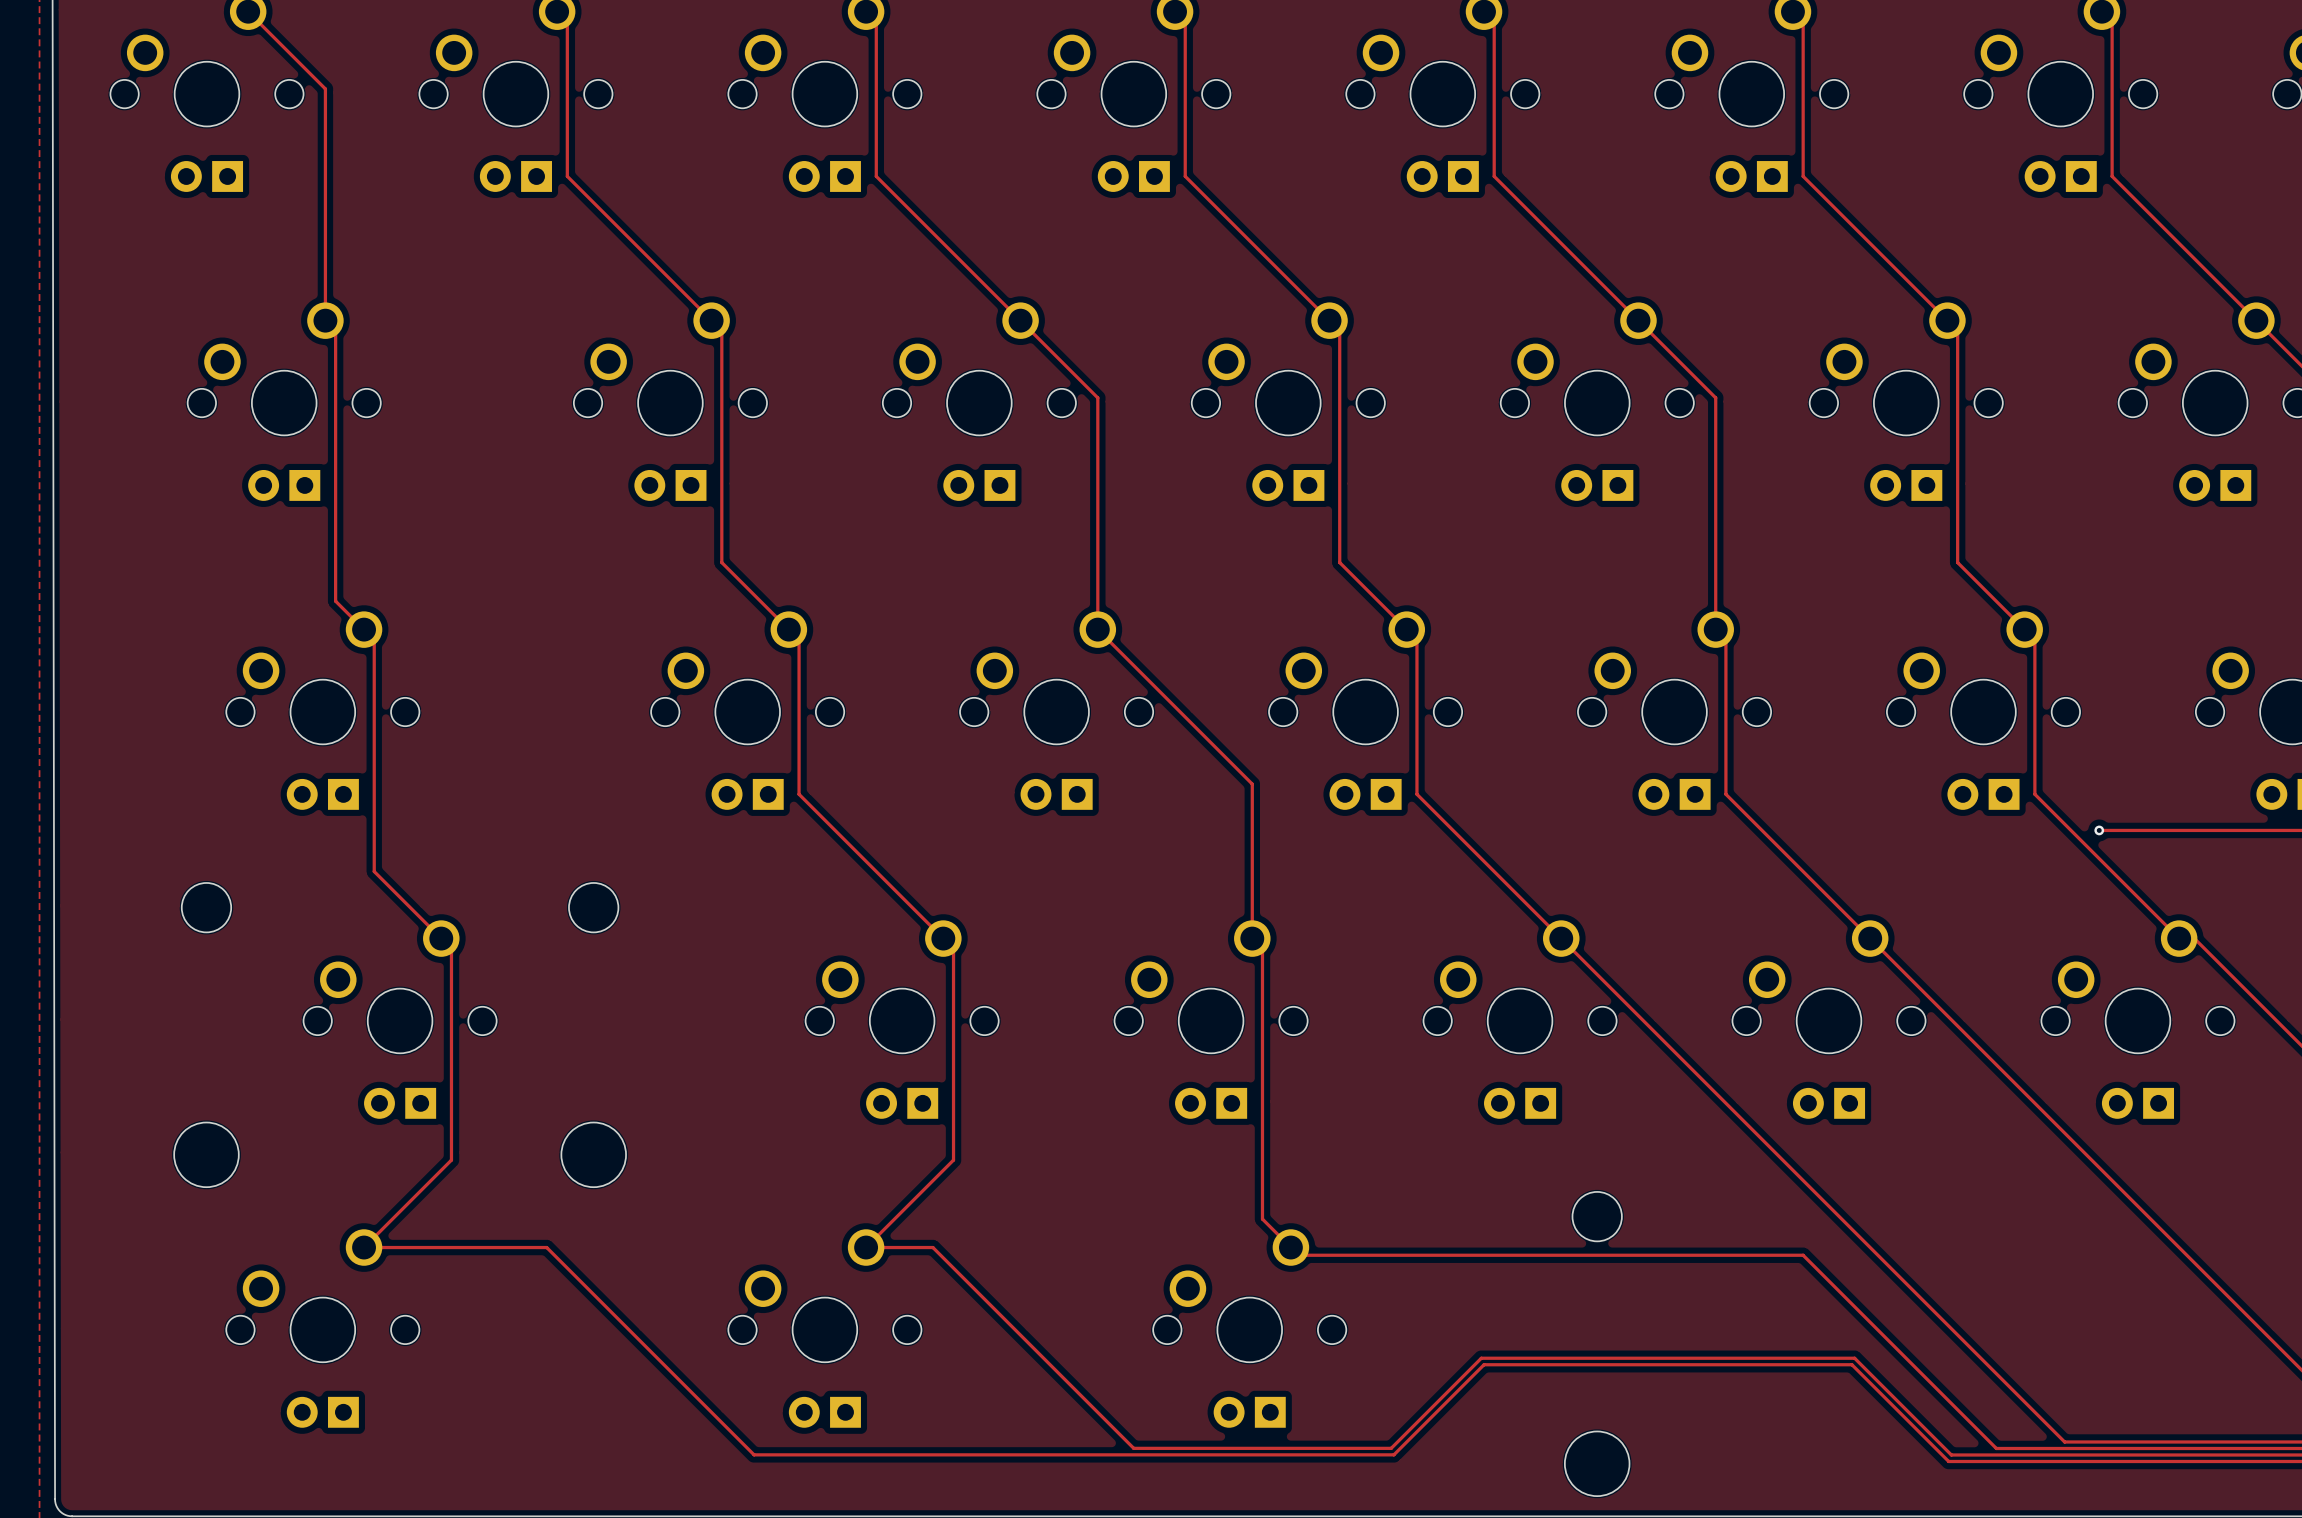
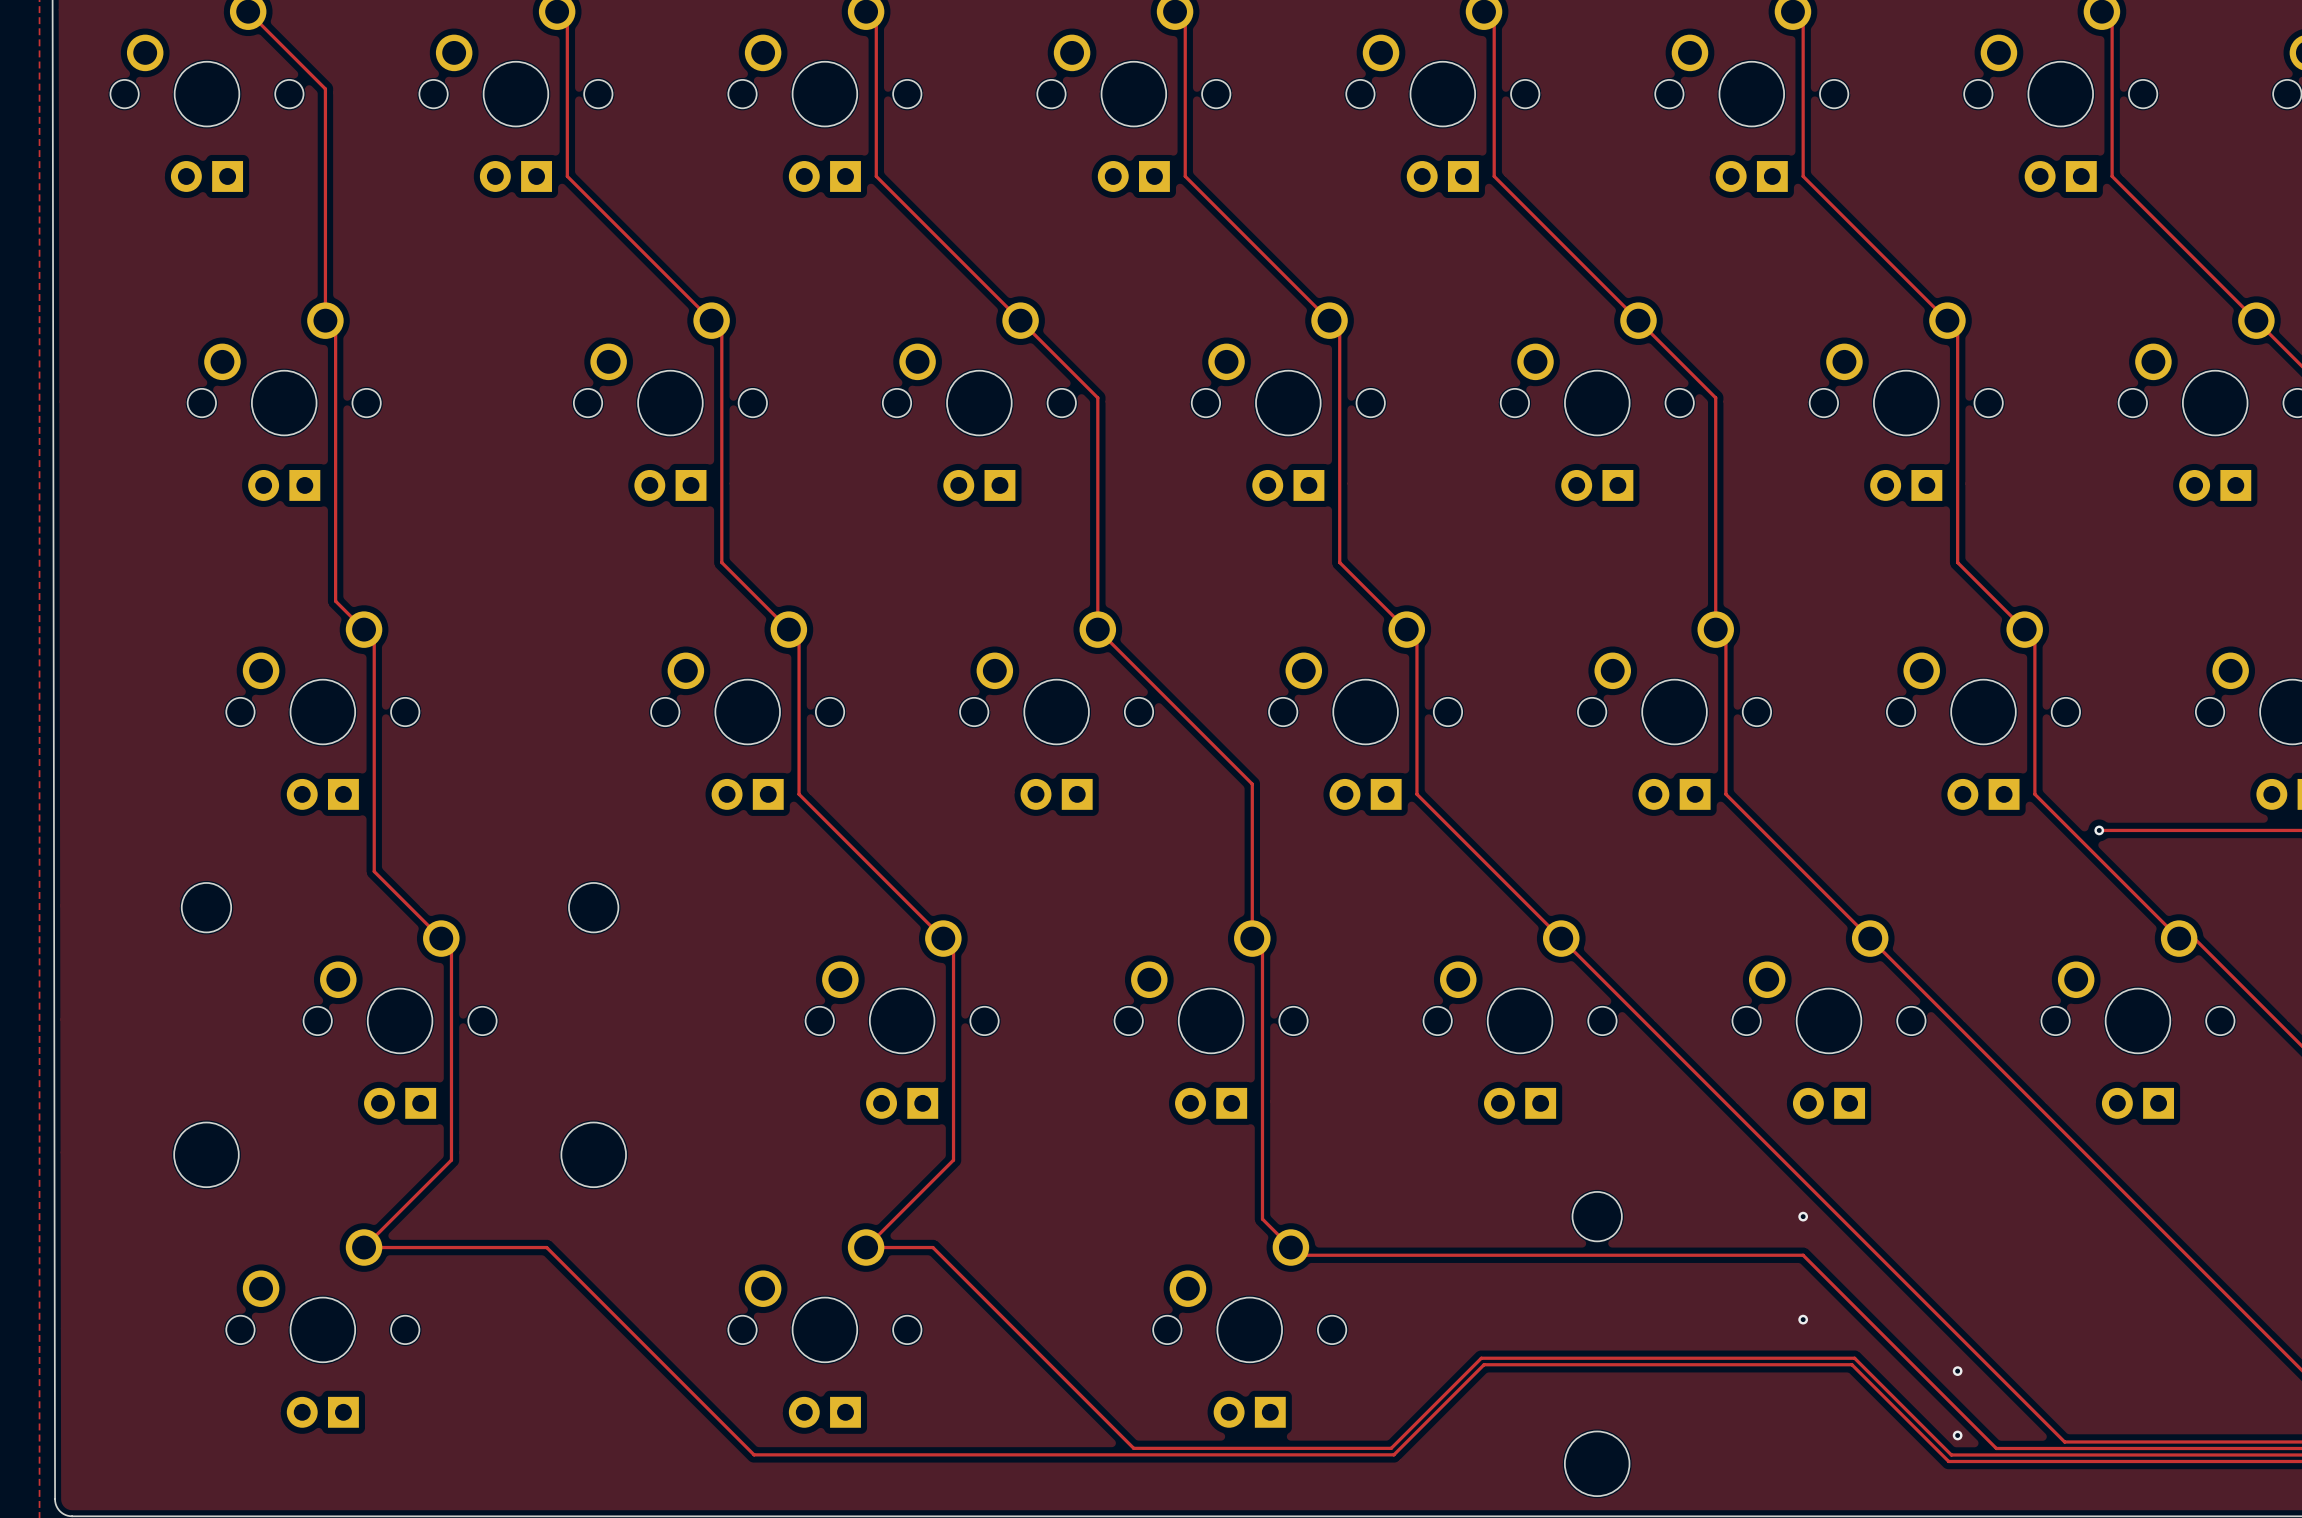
via: none -> (1803, 1216)
via: none -> (1803, 1319)
via: none -> (1957, 1371)
via: none -> (1957, 1435)

